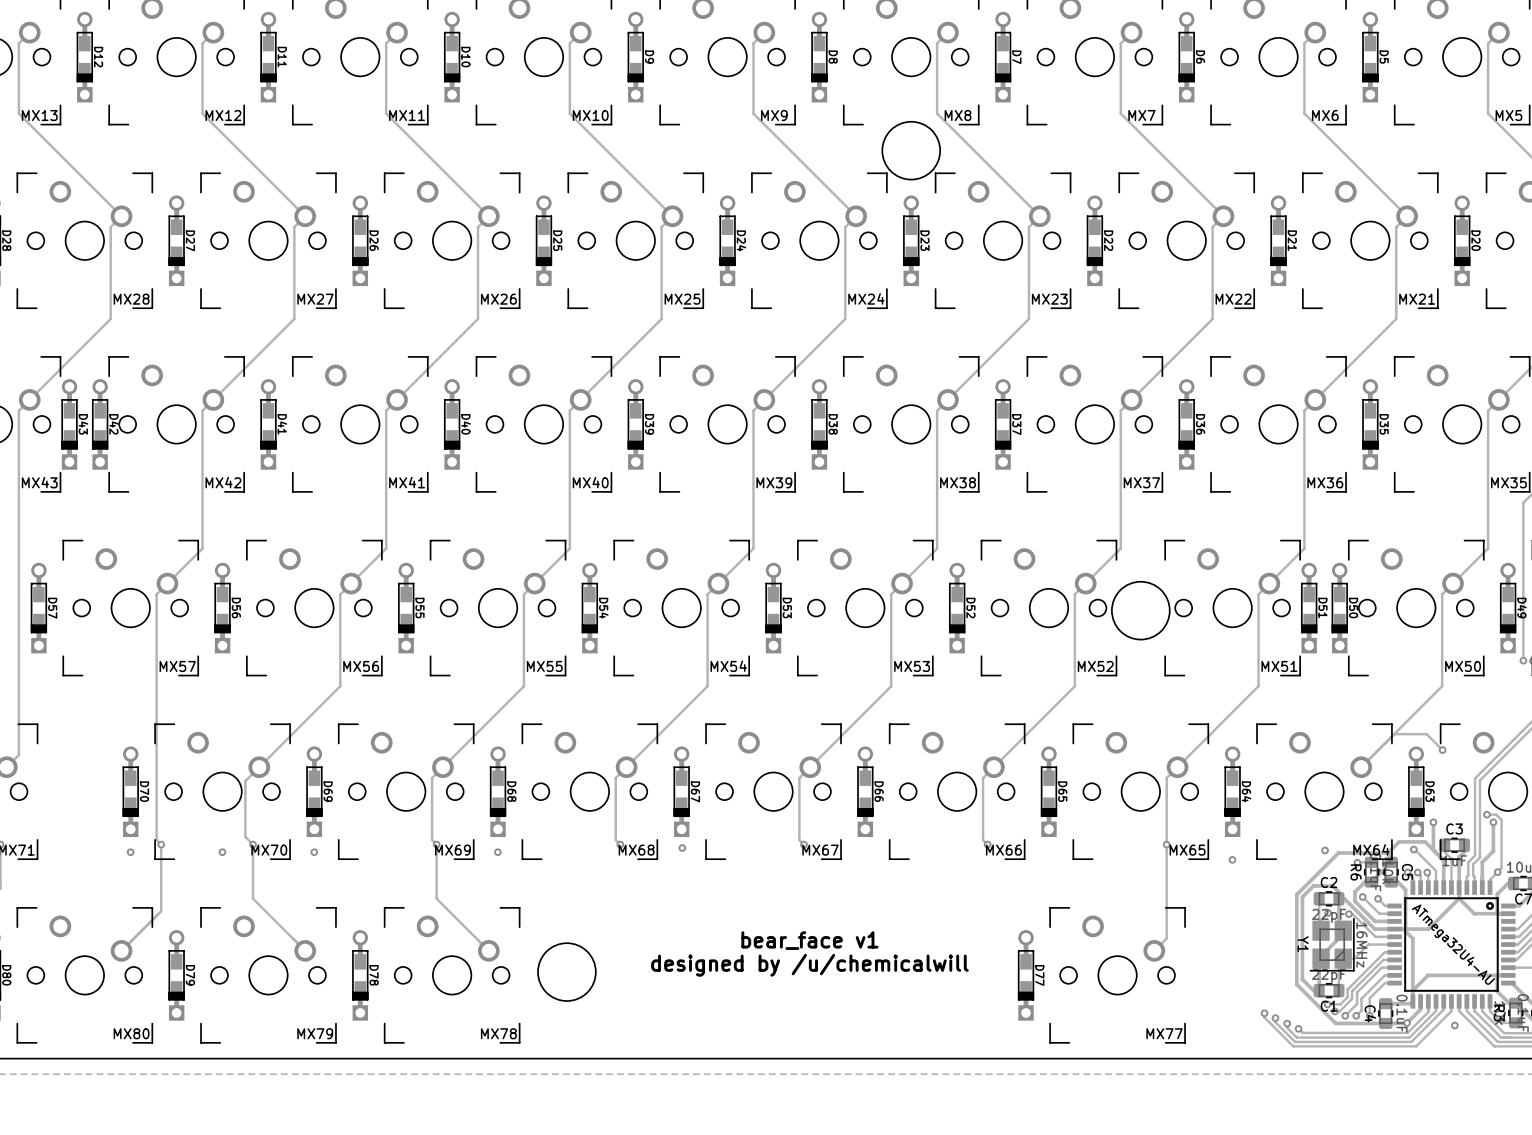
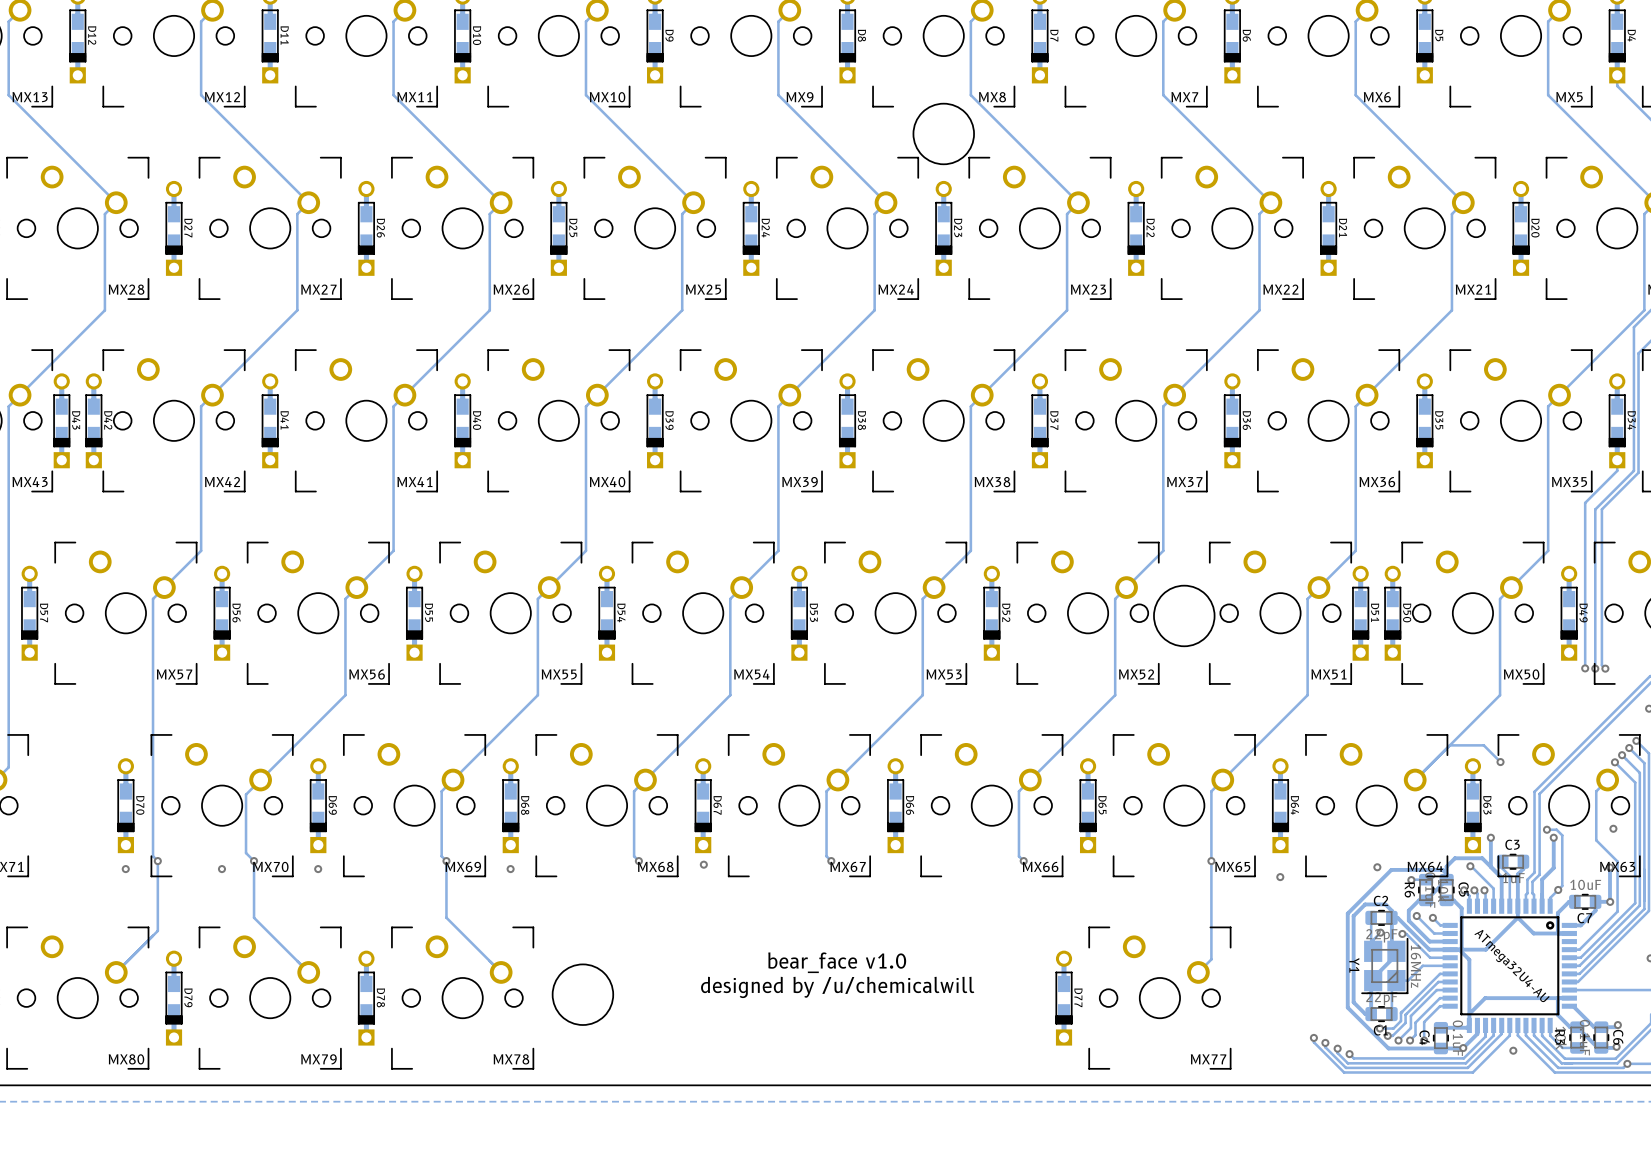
text: bear_face v1 (809, 940) -> bear_face v1.0 (837, 962)

